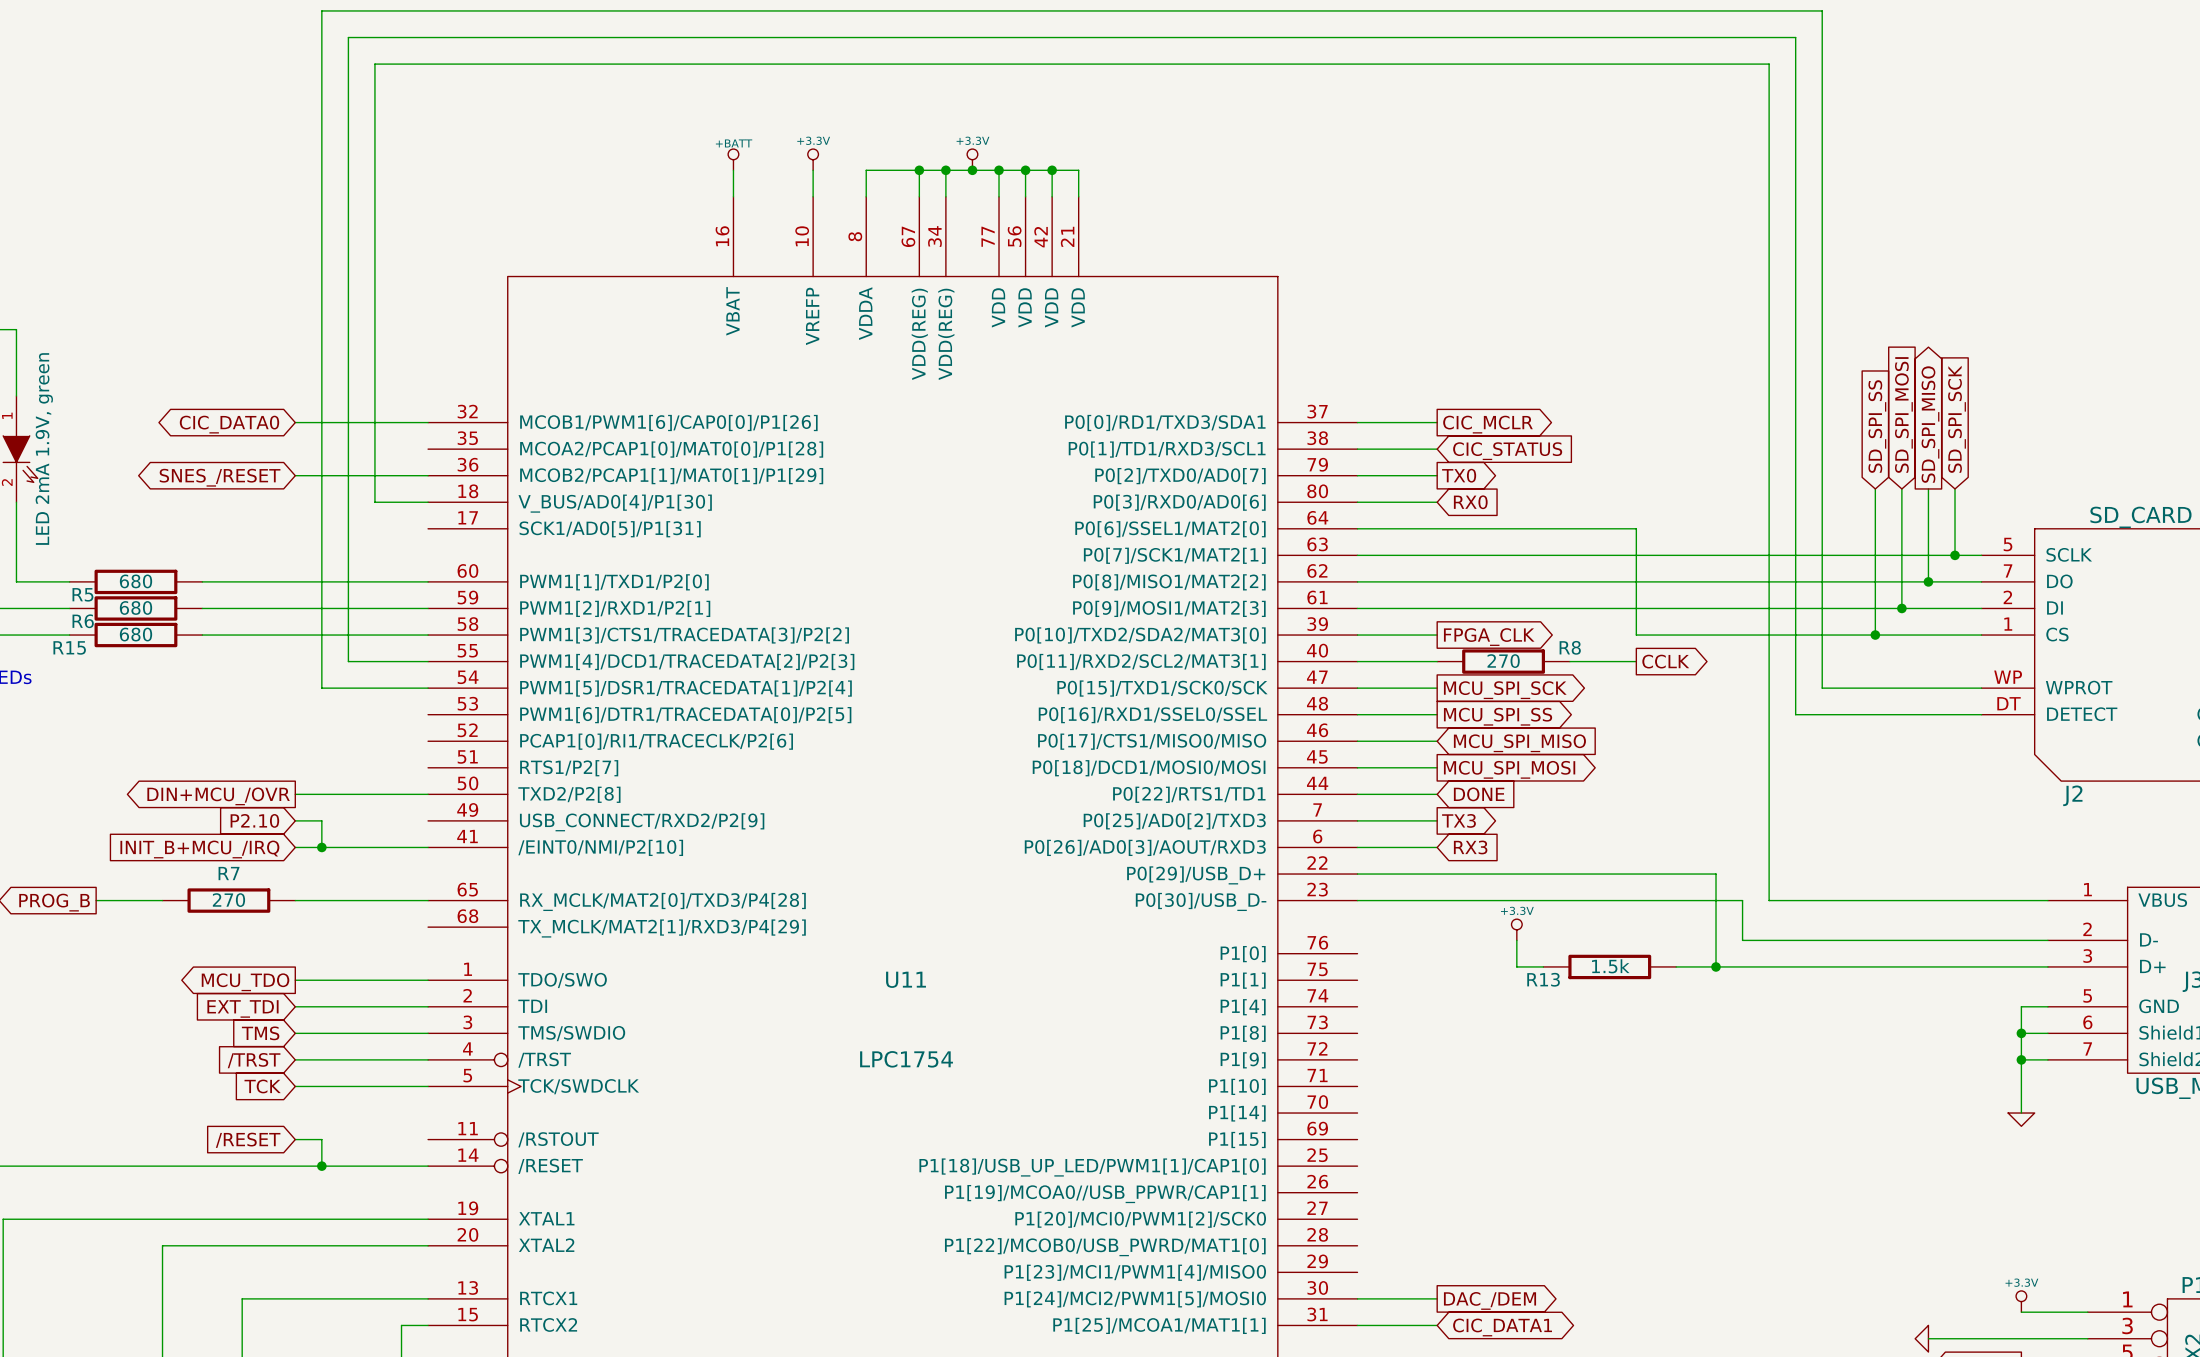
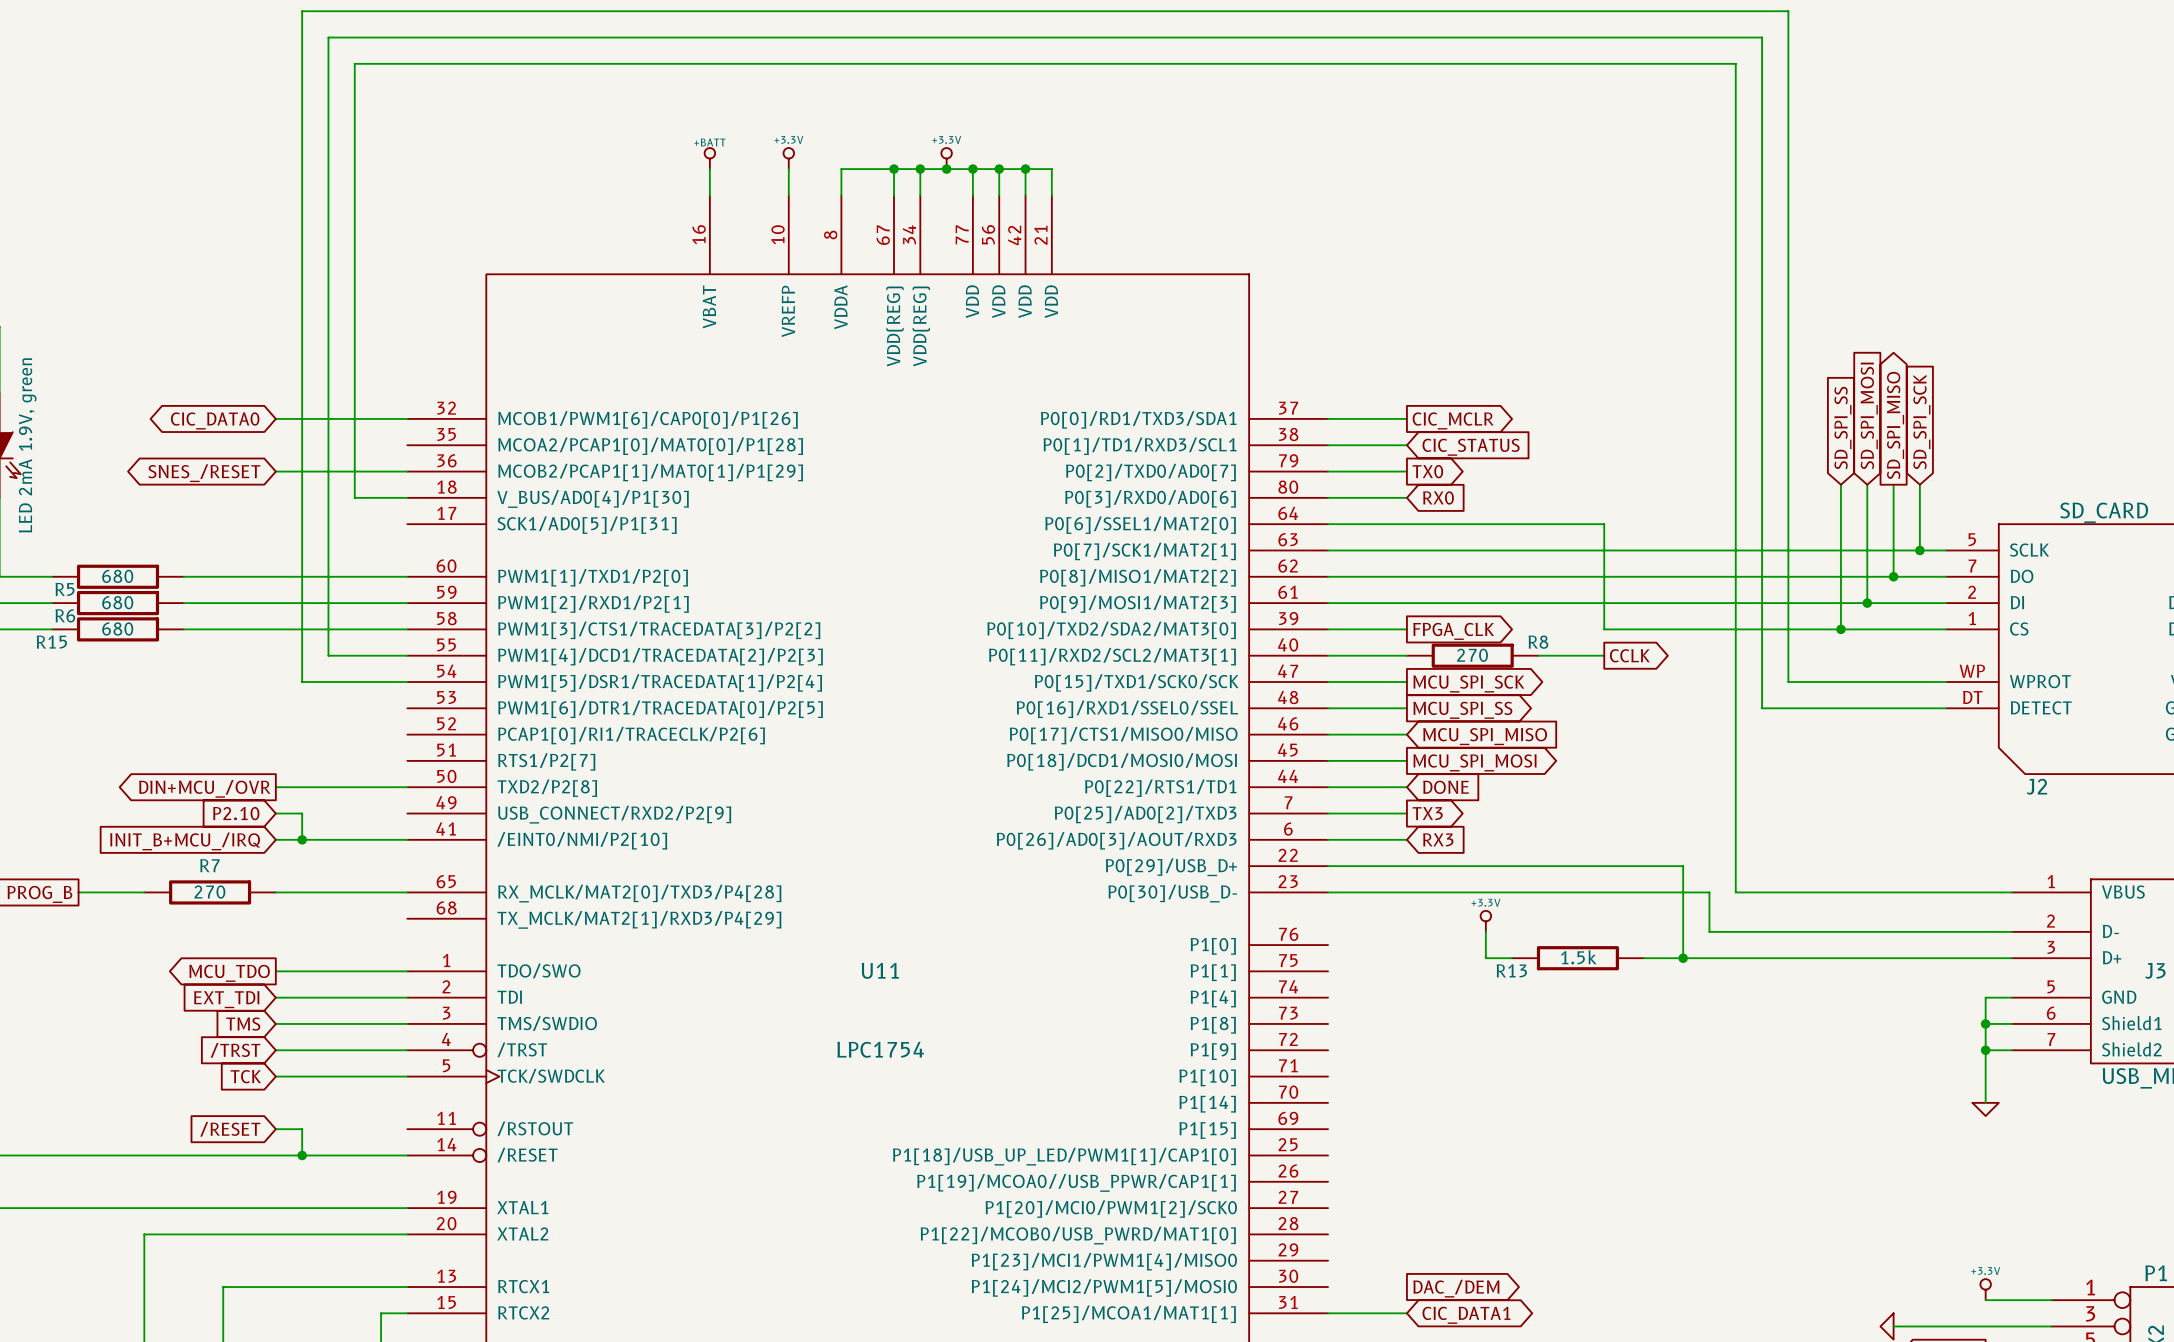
wire: (1357, 1298) (1437, 1298) -> none

